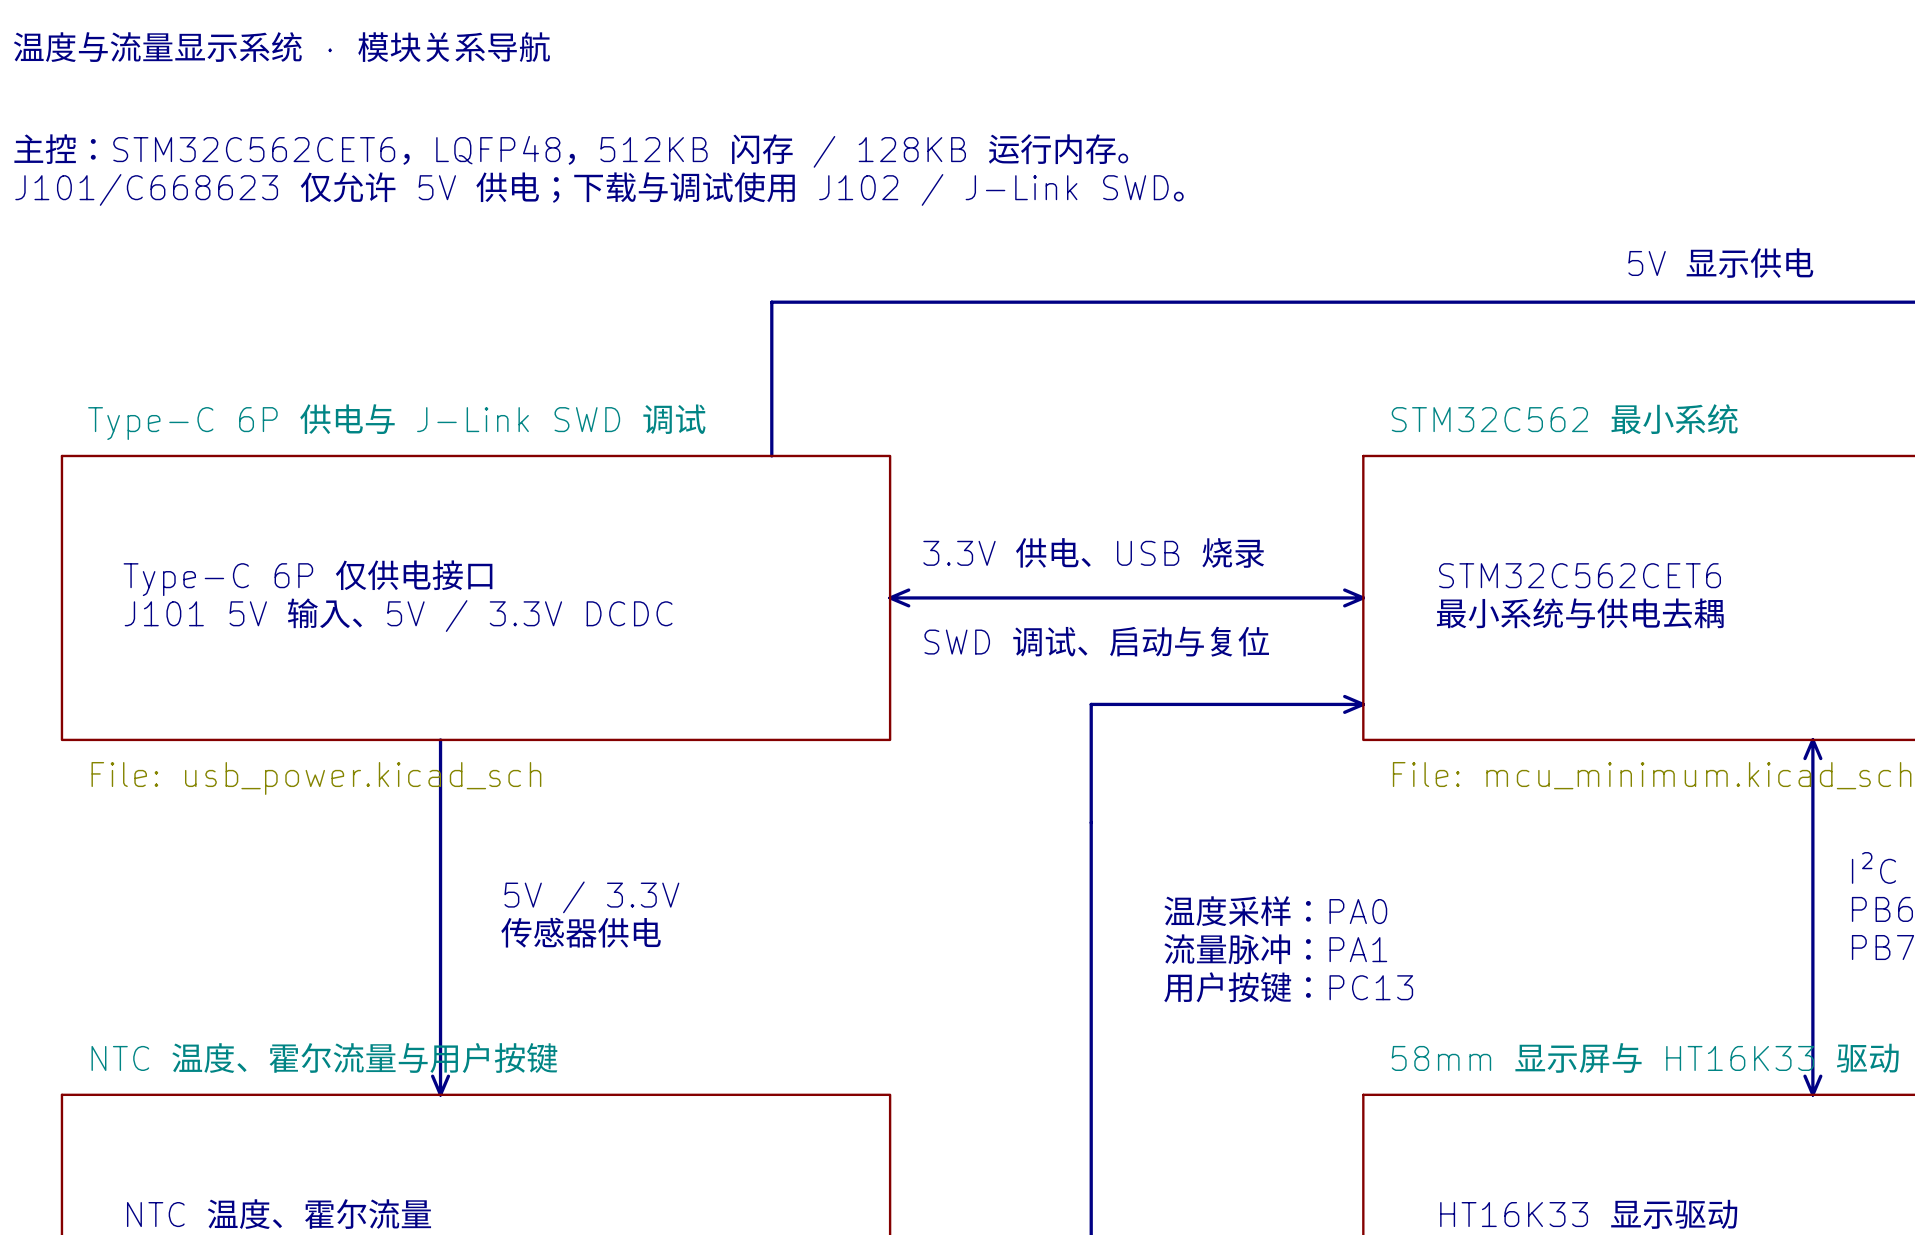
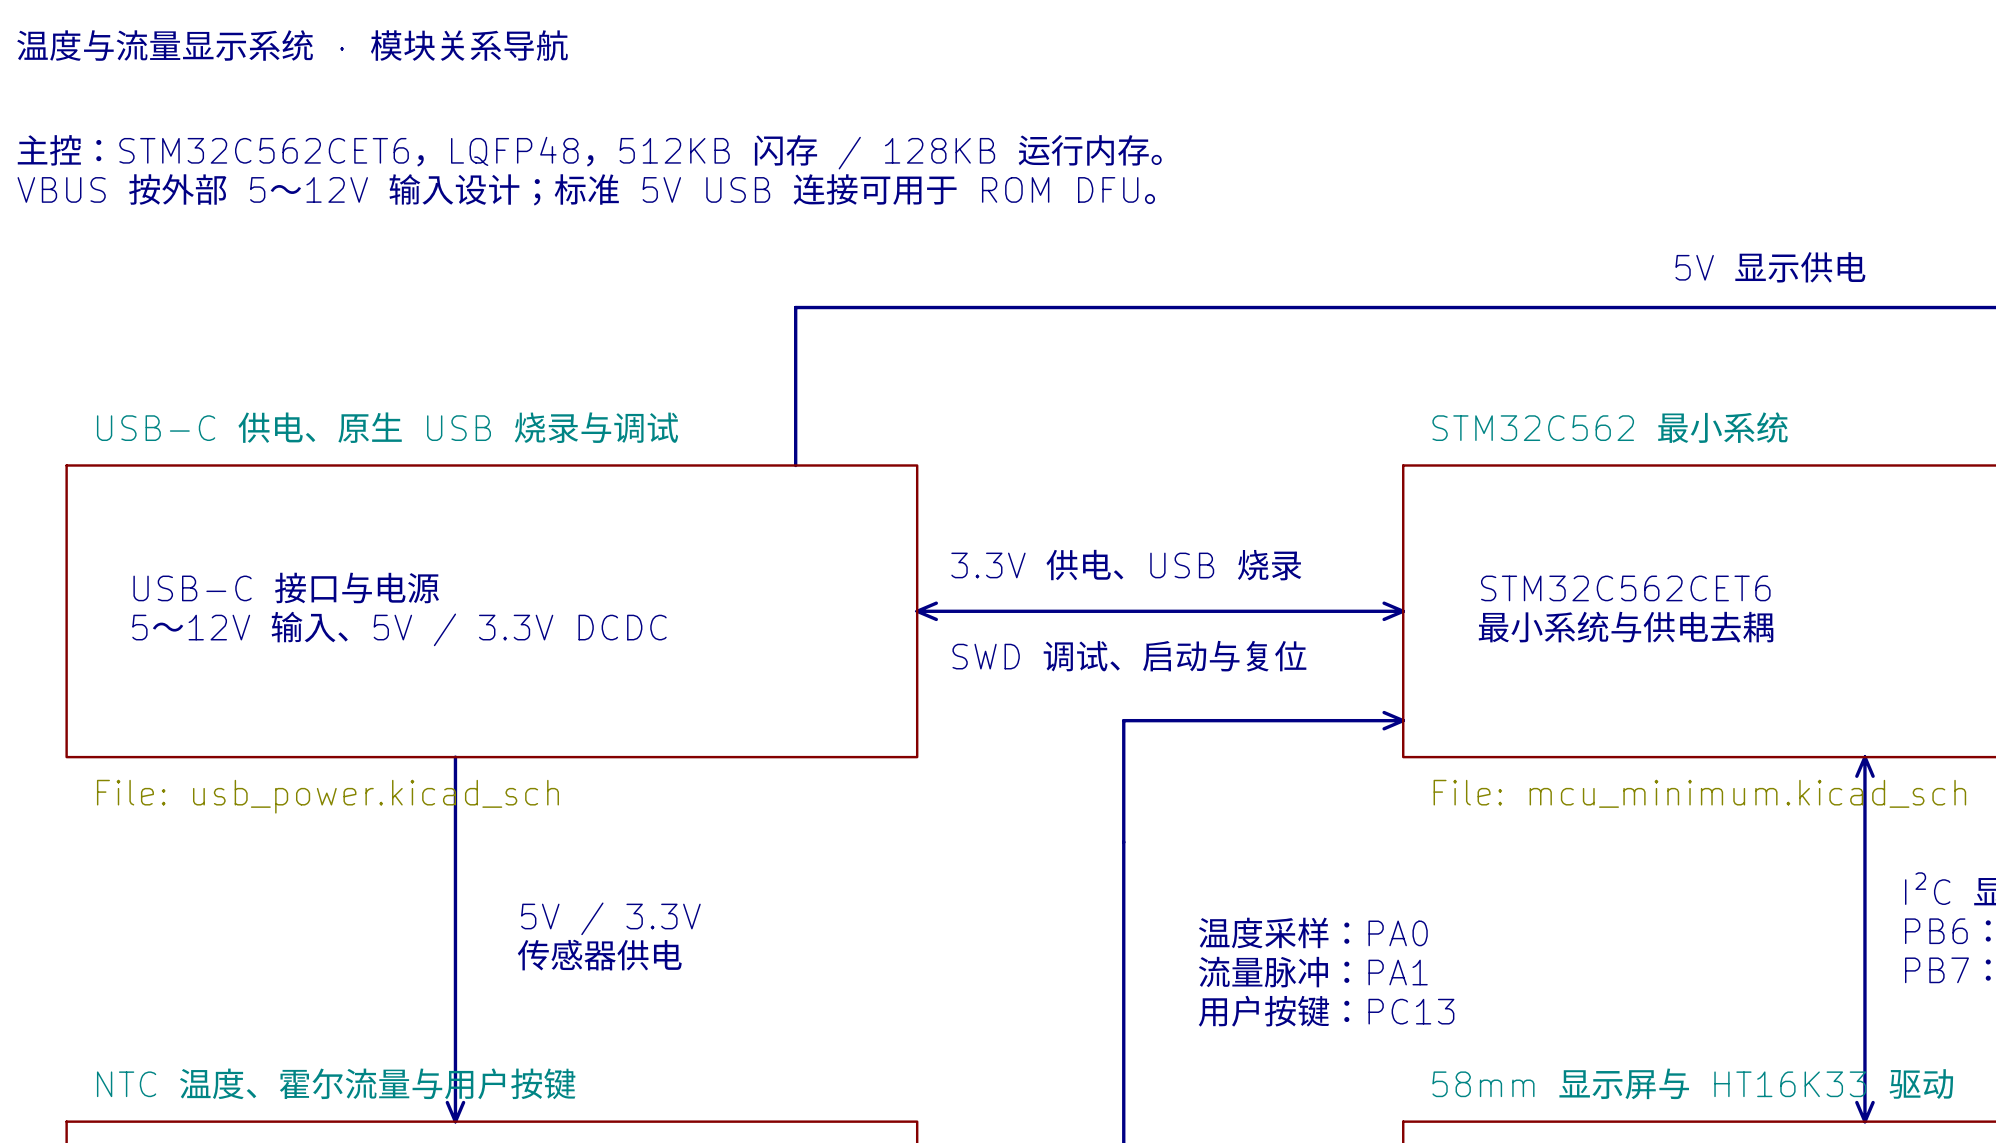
text: J101/C668623 仅允许 5V 供电；下载与调试使用 J102 / J-Link SWD。 (599, 188) -> VBUS 按外部 5～12V 输入设计；标准 5V USB 连接可用于 ROM DFU。 (586, 189)
sheet Type-C 6P 供电与 J-Link SWD 调试 name: Type-C 6P 供电与 J-Link SWD 调试 (397, 421) -> USB-C 供电、原生 USB 烧录与调试 (387, 427)
text: Type-C 6P 仅供电接口 (308, 577) -> USB-C 接口与电源 (286, 587)
text: J101 5V 输入、5V / 3.3V DCDC (398, 614) -> 5～12V 输入、5V / 3.3V DCDC (399, 628)

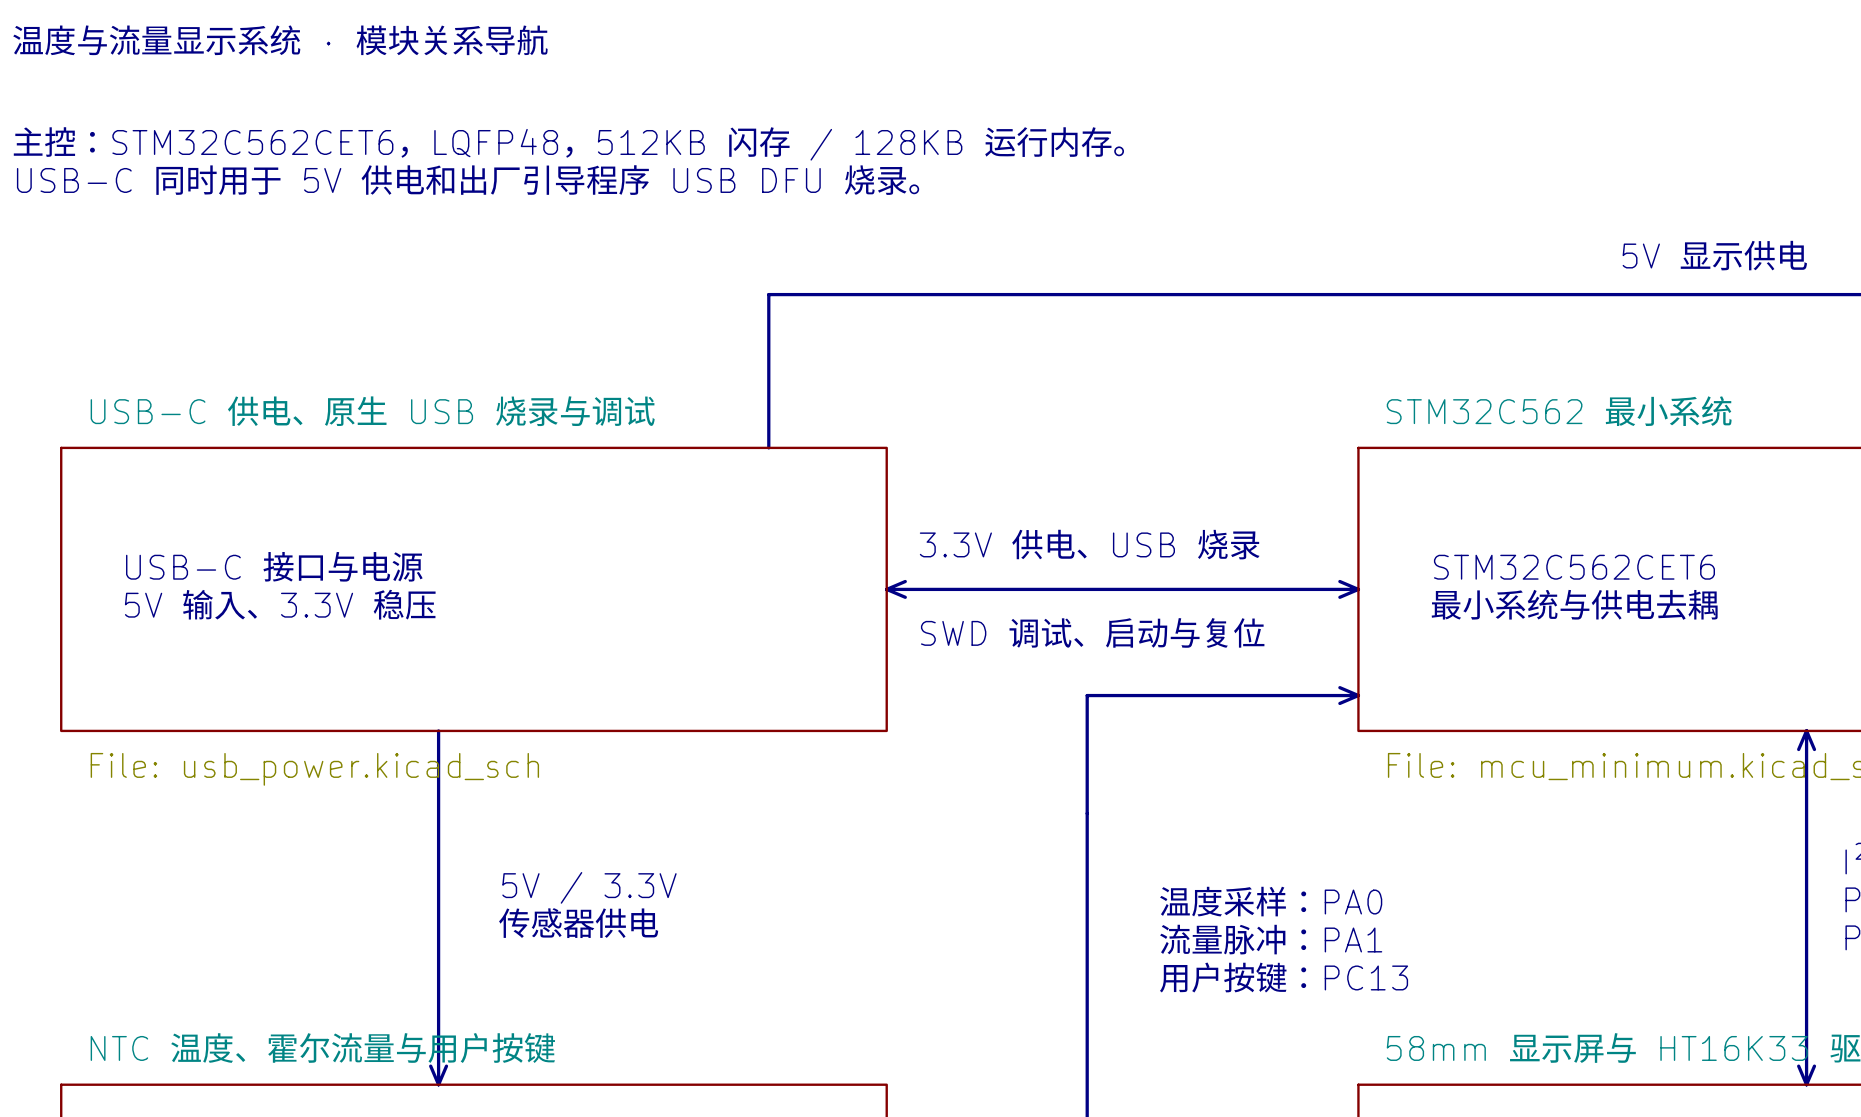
text: VBUS 按外部 5～12V 输入设计；标准 5V USB 连接可用于 ROM DFU。 (586, 189) -> USB-C 同时用于 5V 供电和出厂引导程序 USB DFU 烧录。 (468, 180)
text: 5～12V 输入、5V / 3.3V DCDC (399, 628) -> 5V 输入、3.3V 稳压 (280, 604)

